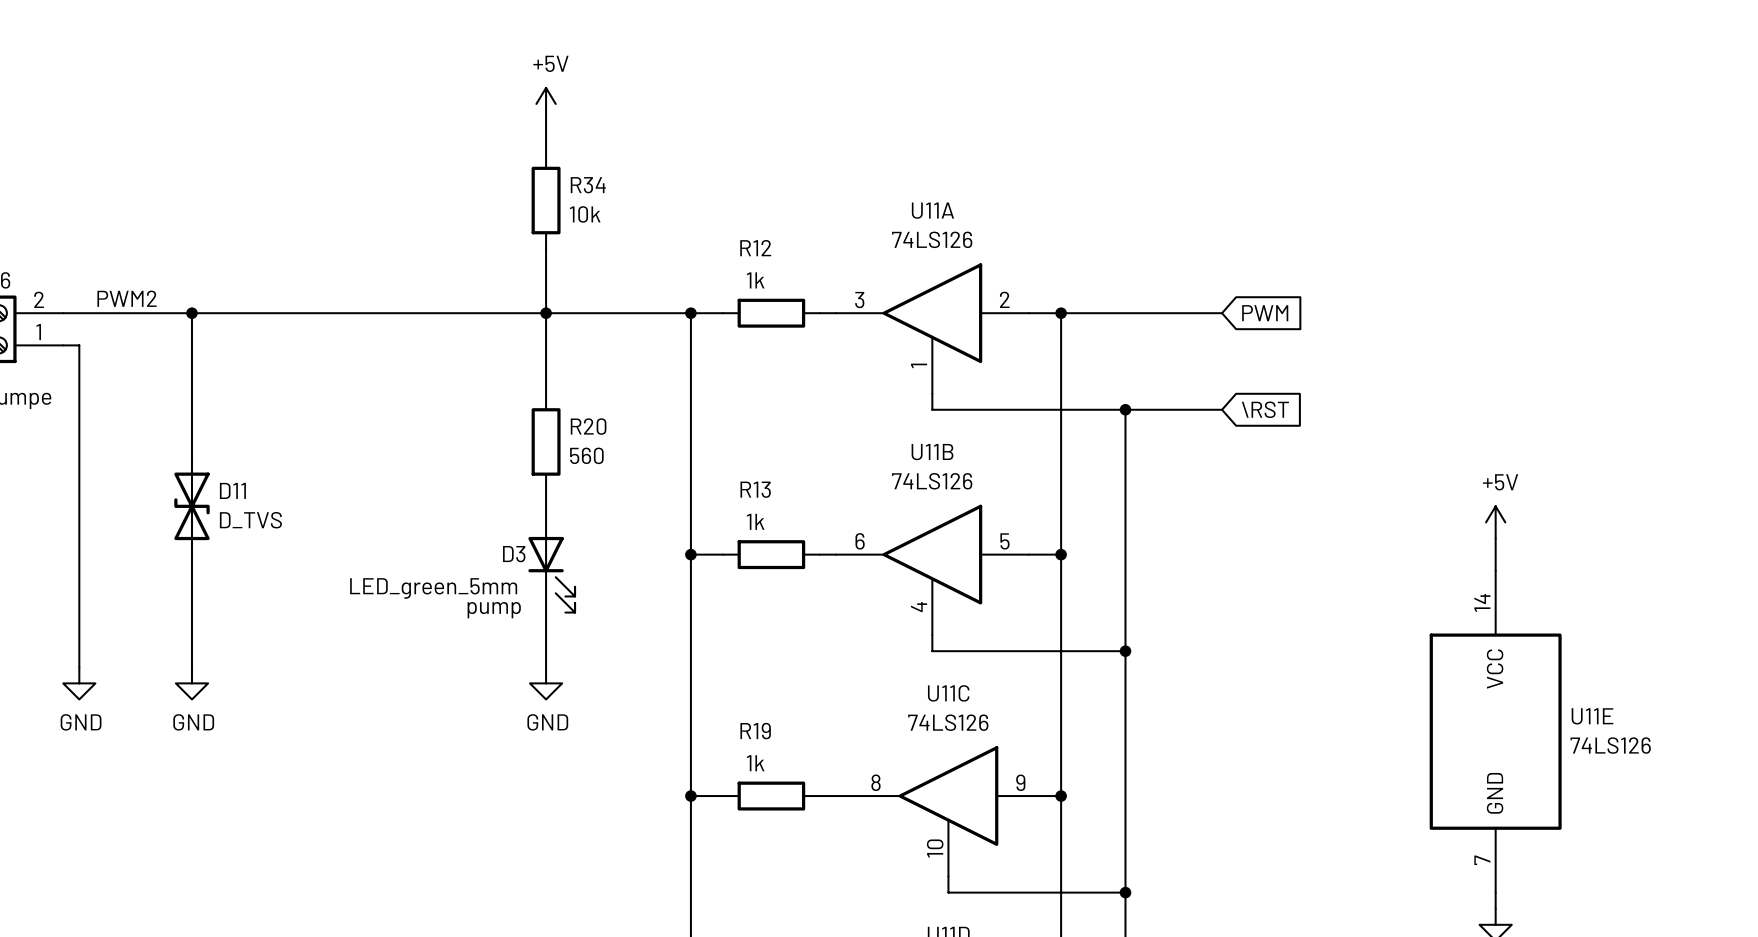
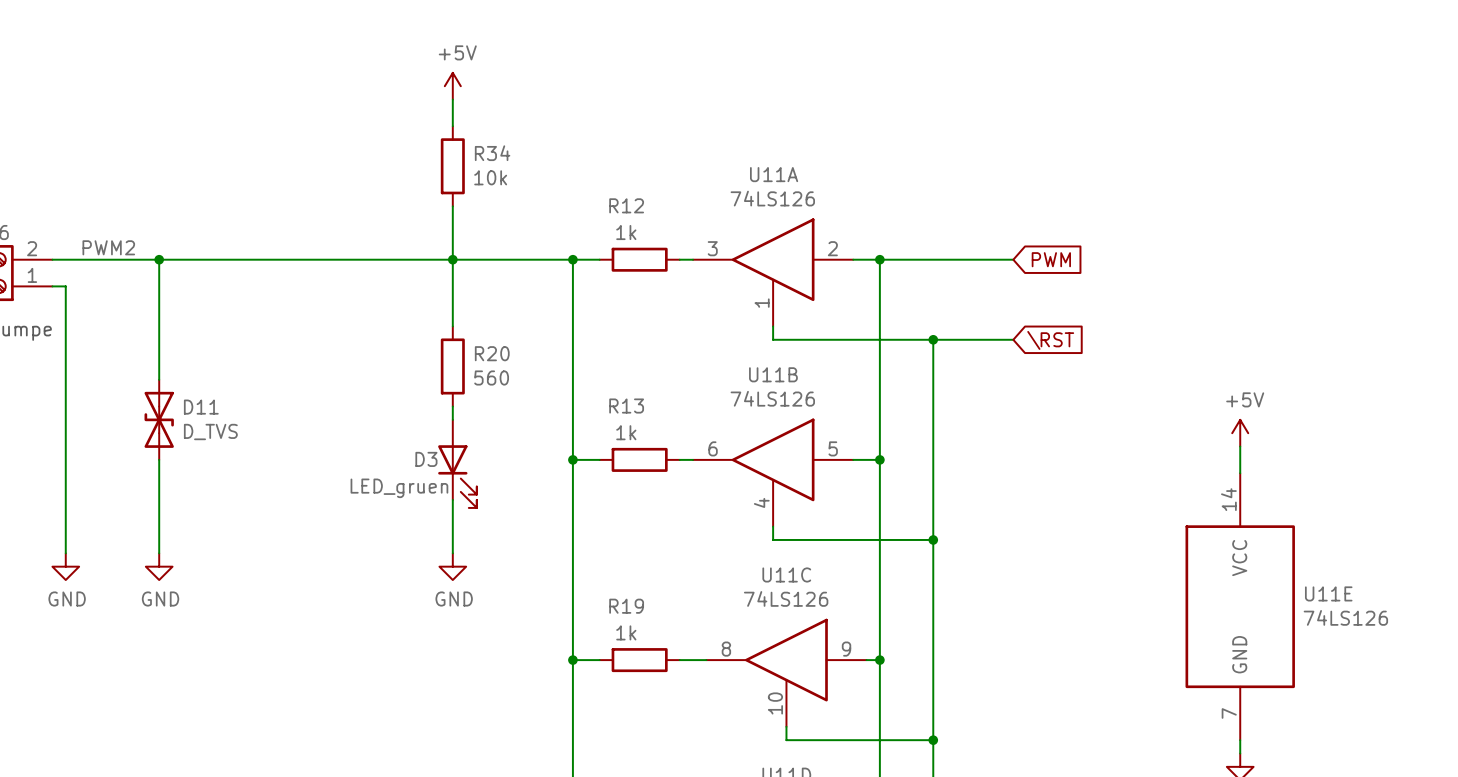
D3 value: LED_green_5mm (433, 588) -> LED_gruen (399, 488)
text: pump (494, 610) -> none

